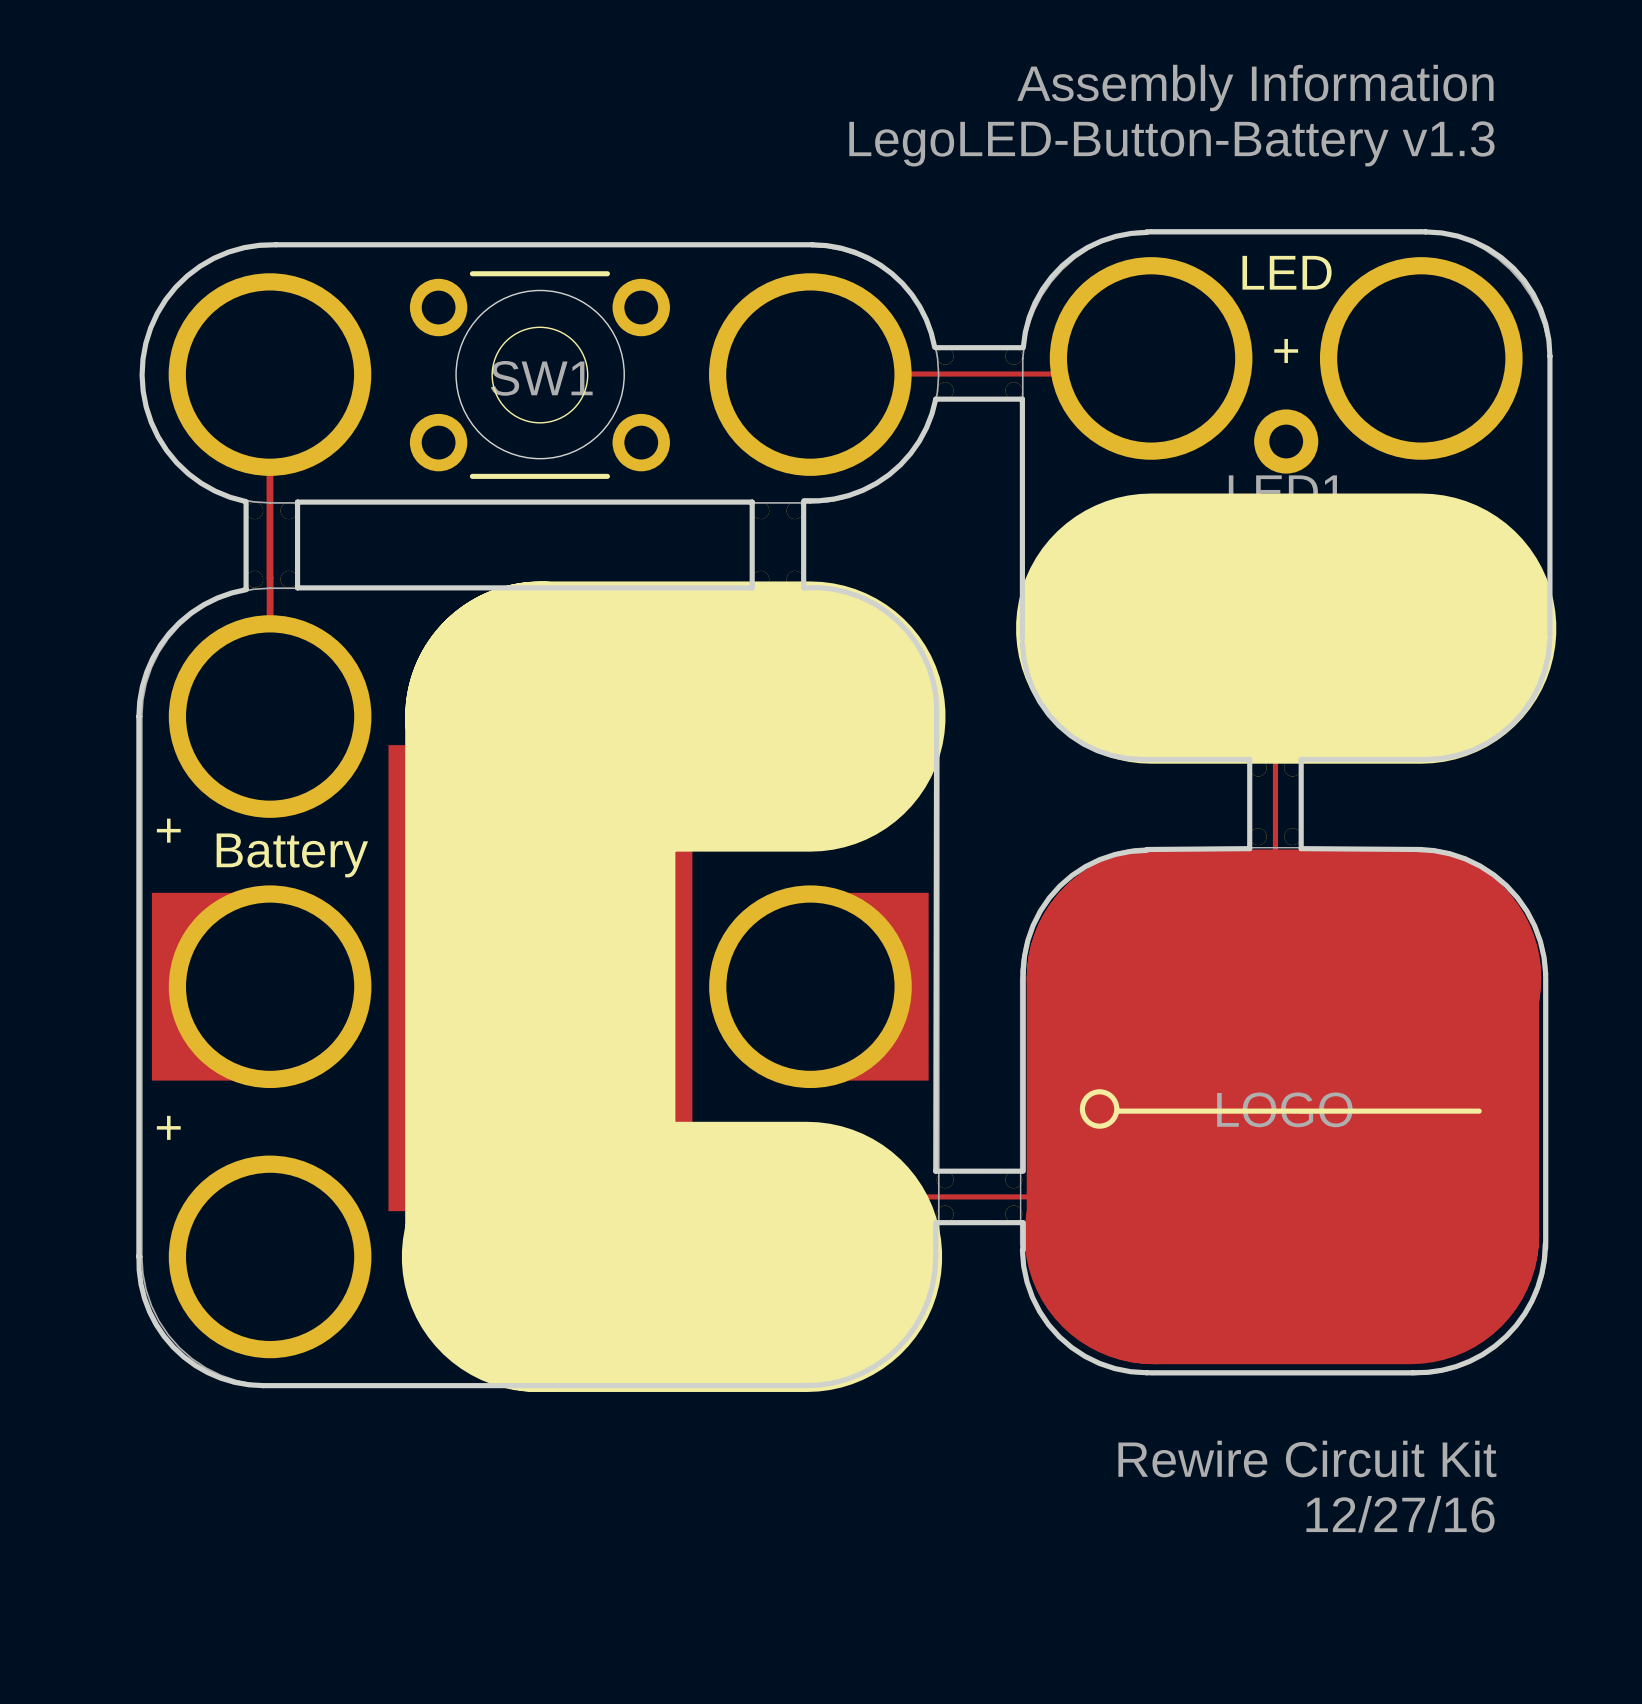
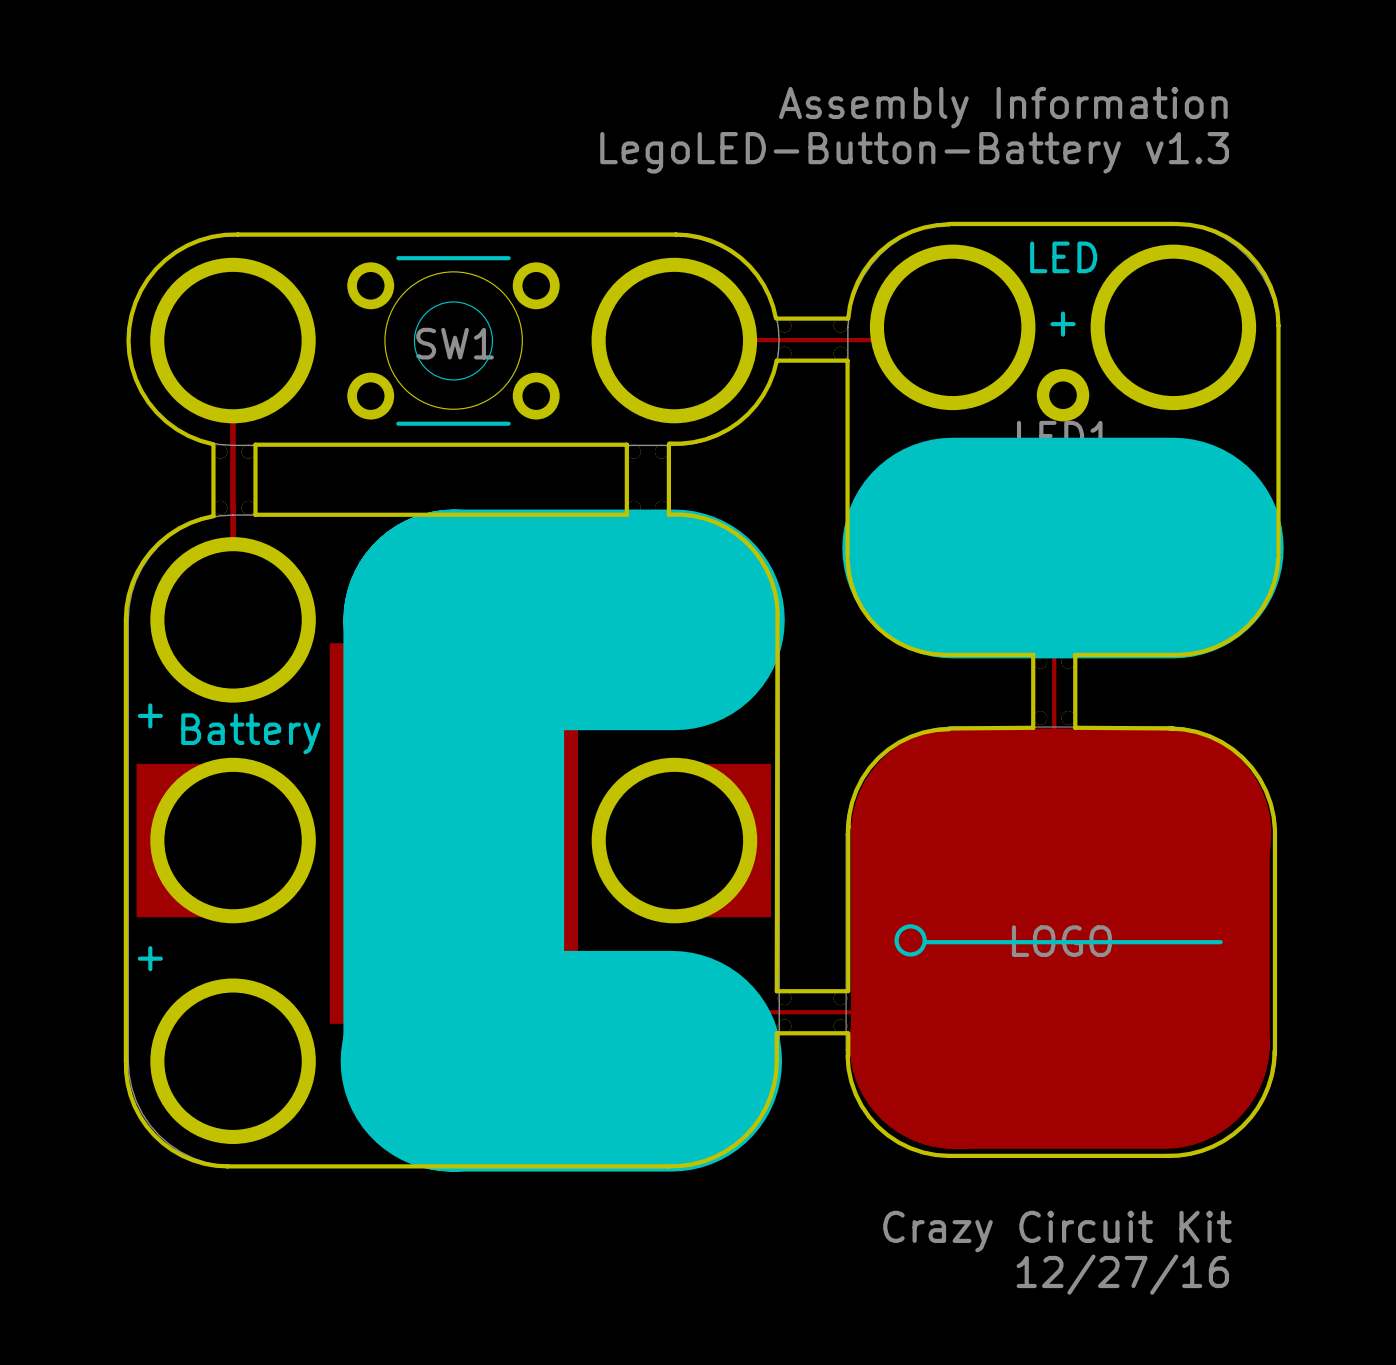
text: Rewire Circuit Kit (1307, 1458) -> Crazy Circuit Kit (1057, 1231)

